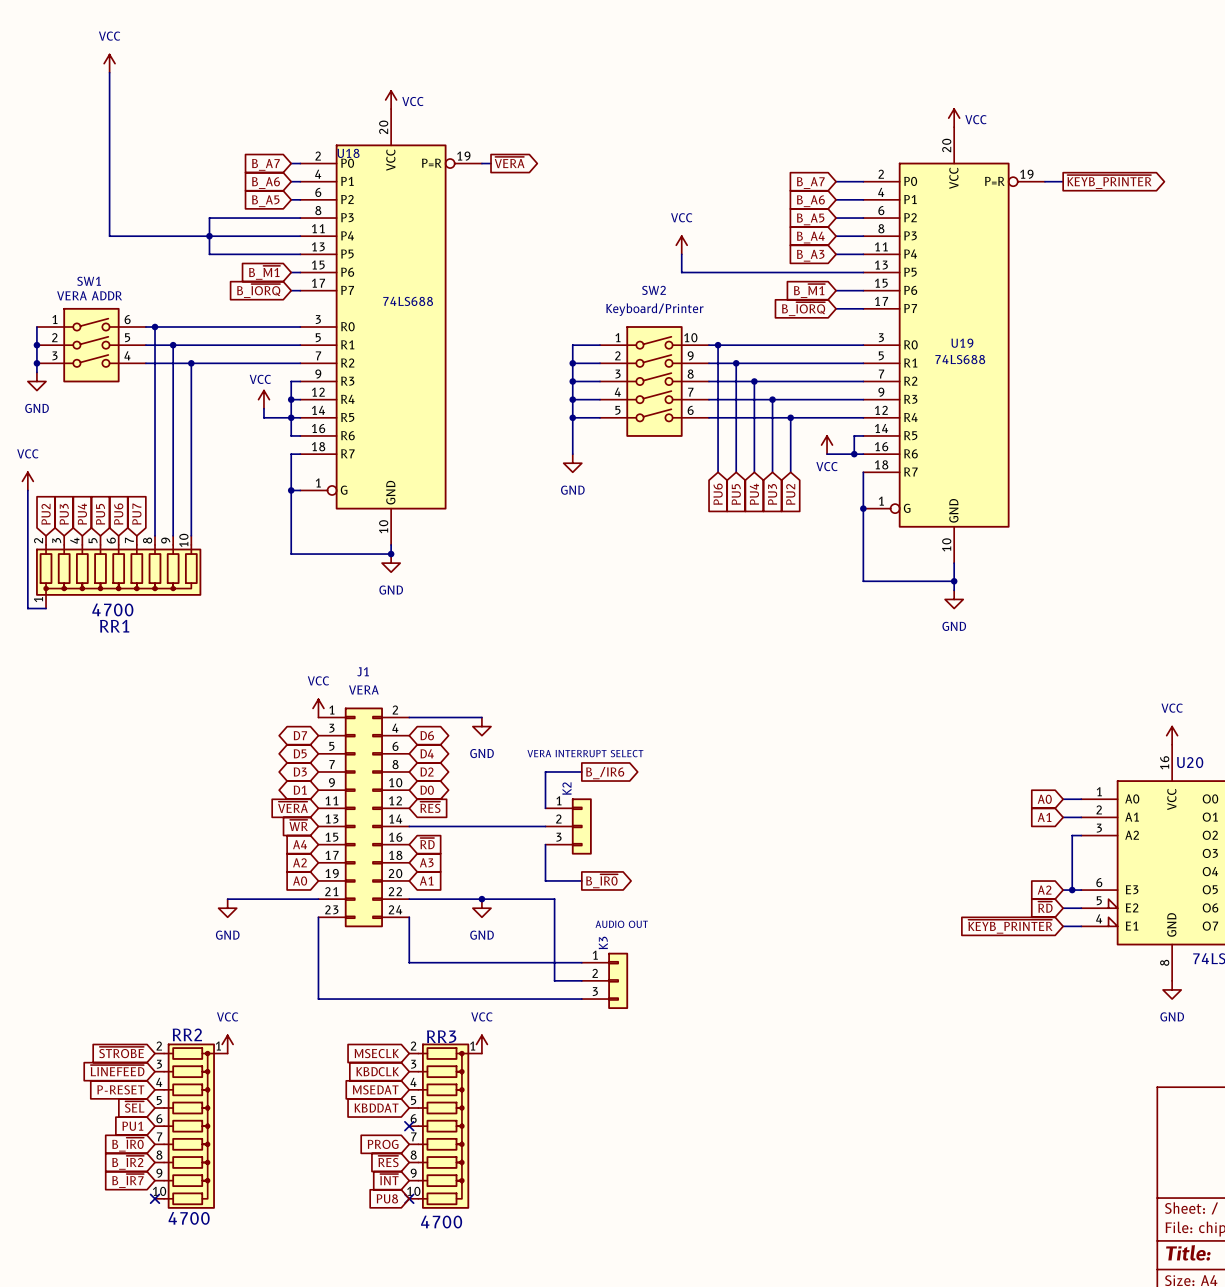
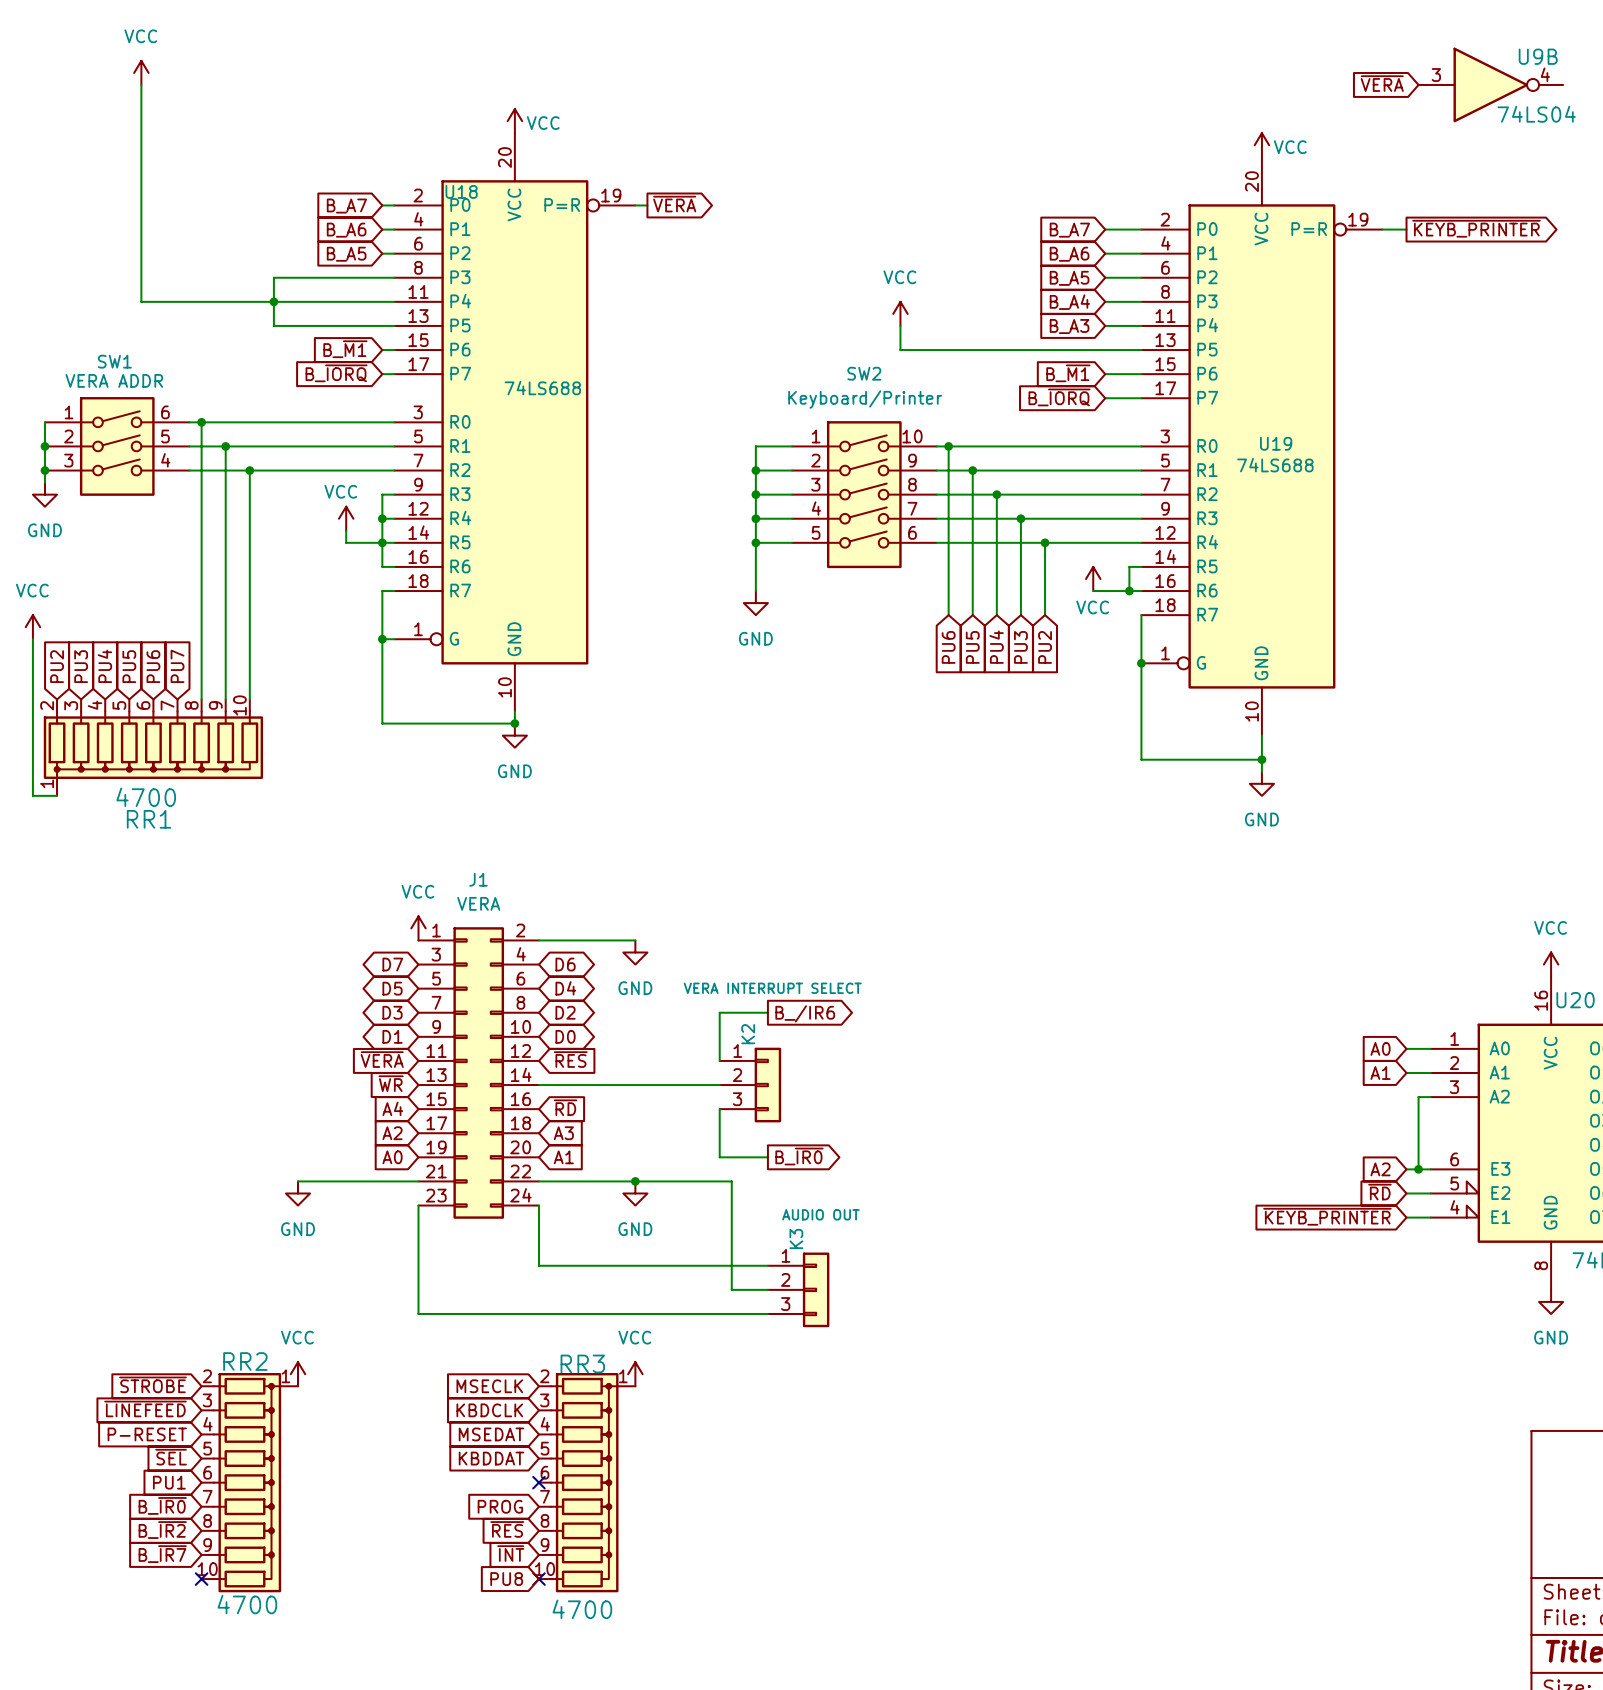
global label: none -> ~{VERA} (1382, 83)
U9B: none -> 74LS04 (1490, 84)

